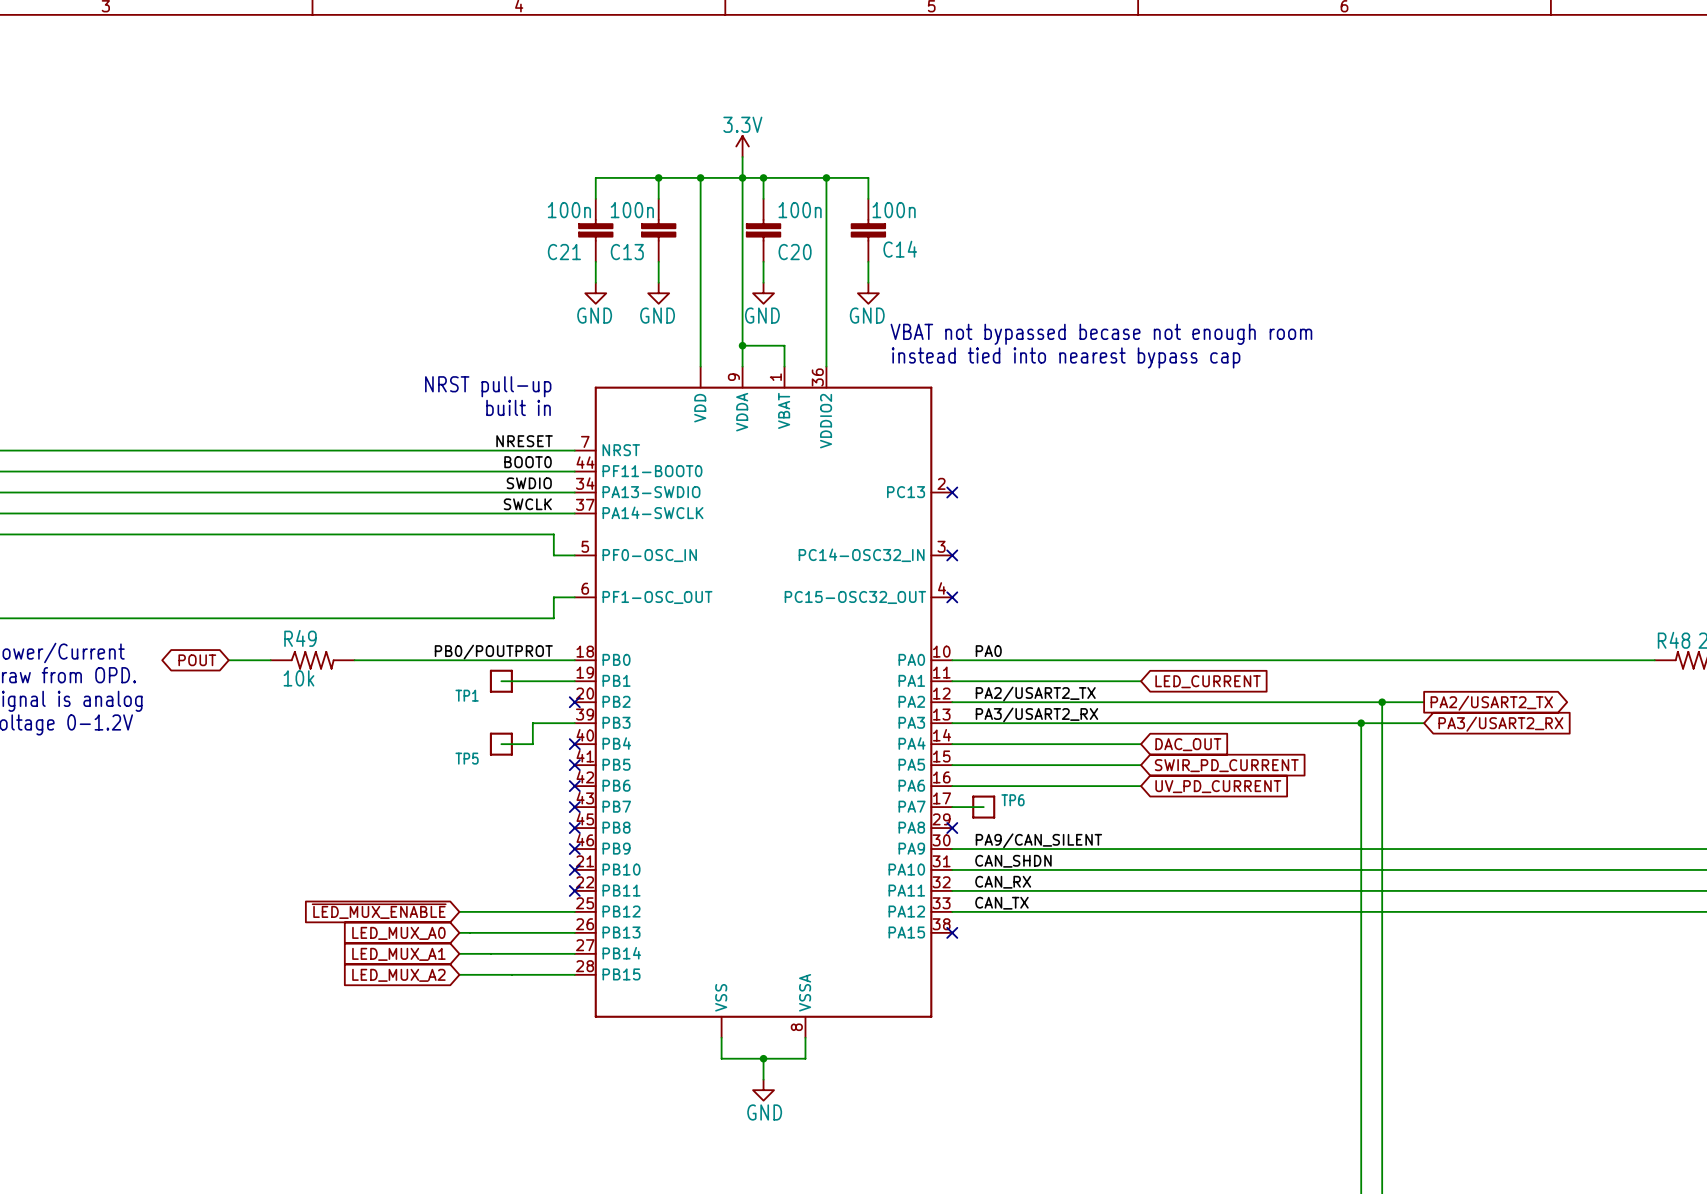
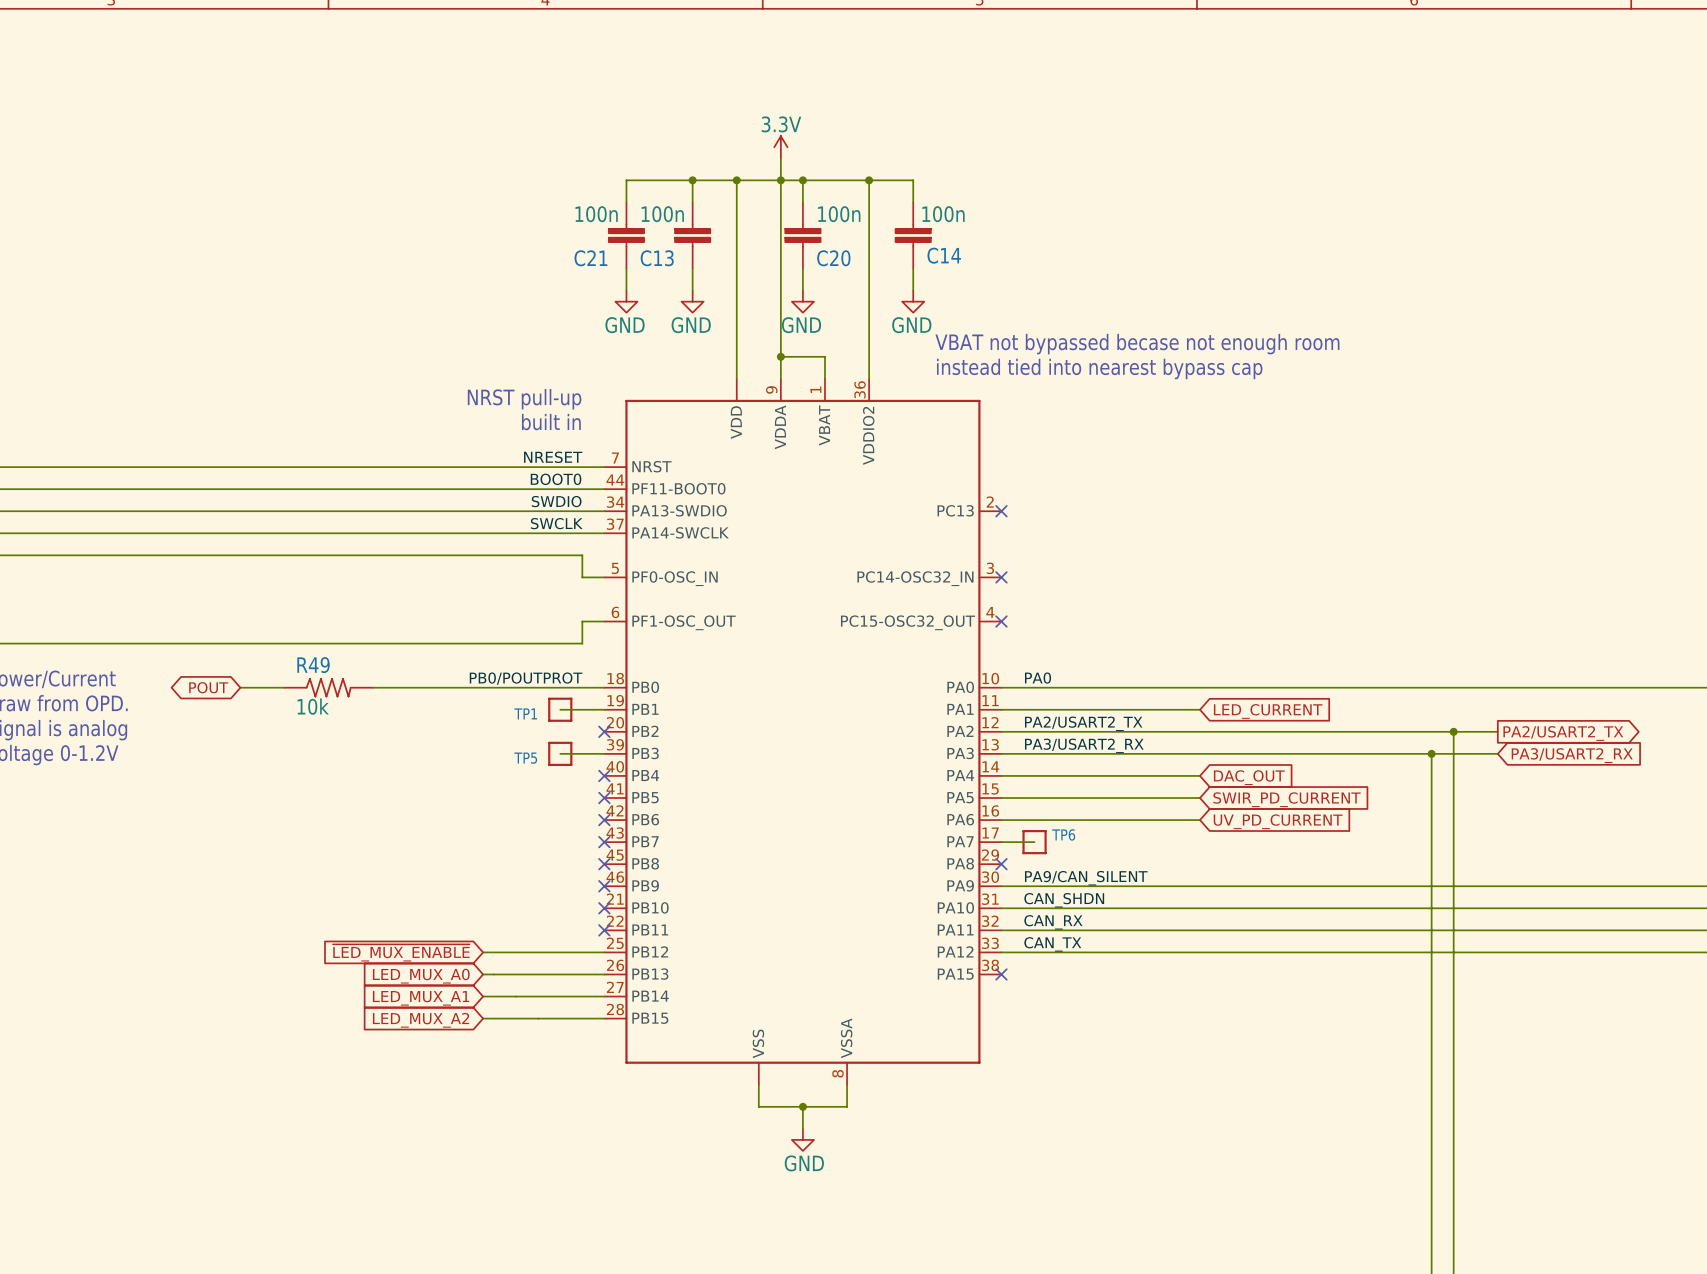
wire: (501, 681) (532, 681) -> none
TP1 position: (501, 681) -> (560, 709)
TP1 name position: TP1 (467, 695) -> TP1 (525, 713)
wire: (532, 723) (532, 744) (501, 744) -> none
TP5 position: (501, 744) -> (560, 753)
TP5 name position: TP5 (467, 758) -> TP5 (525, 758)

